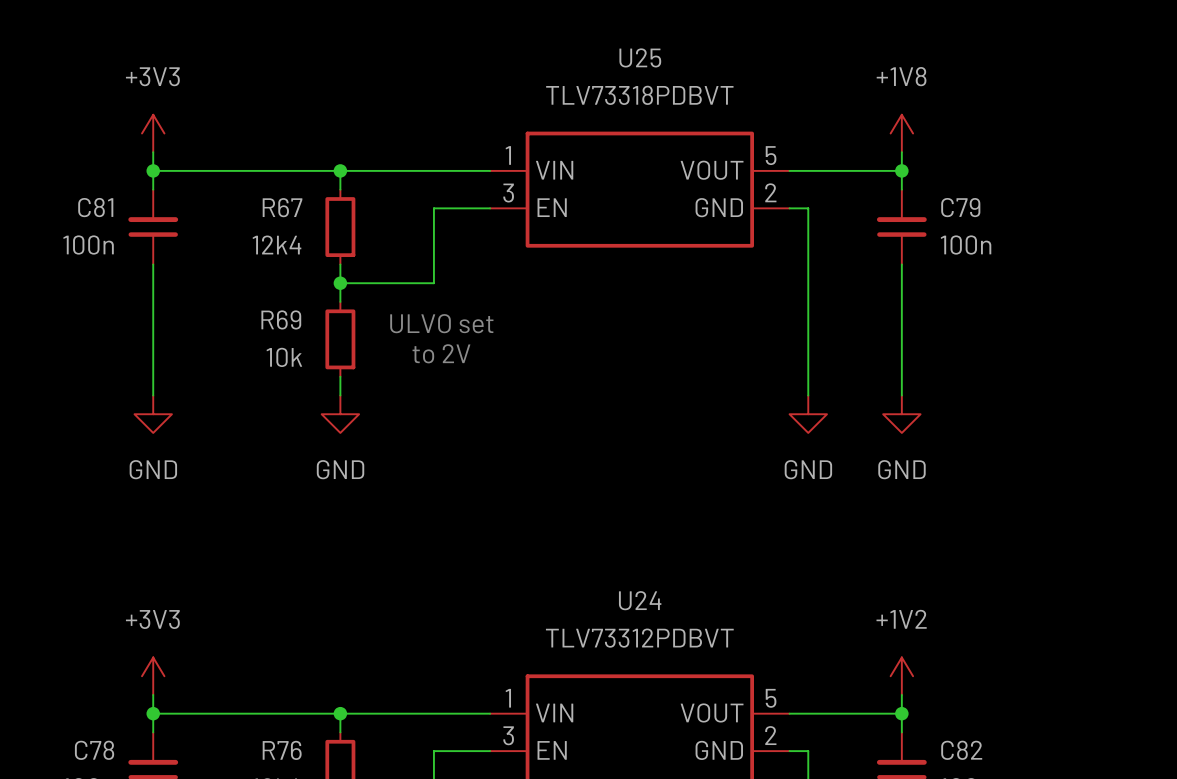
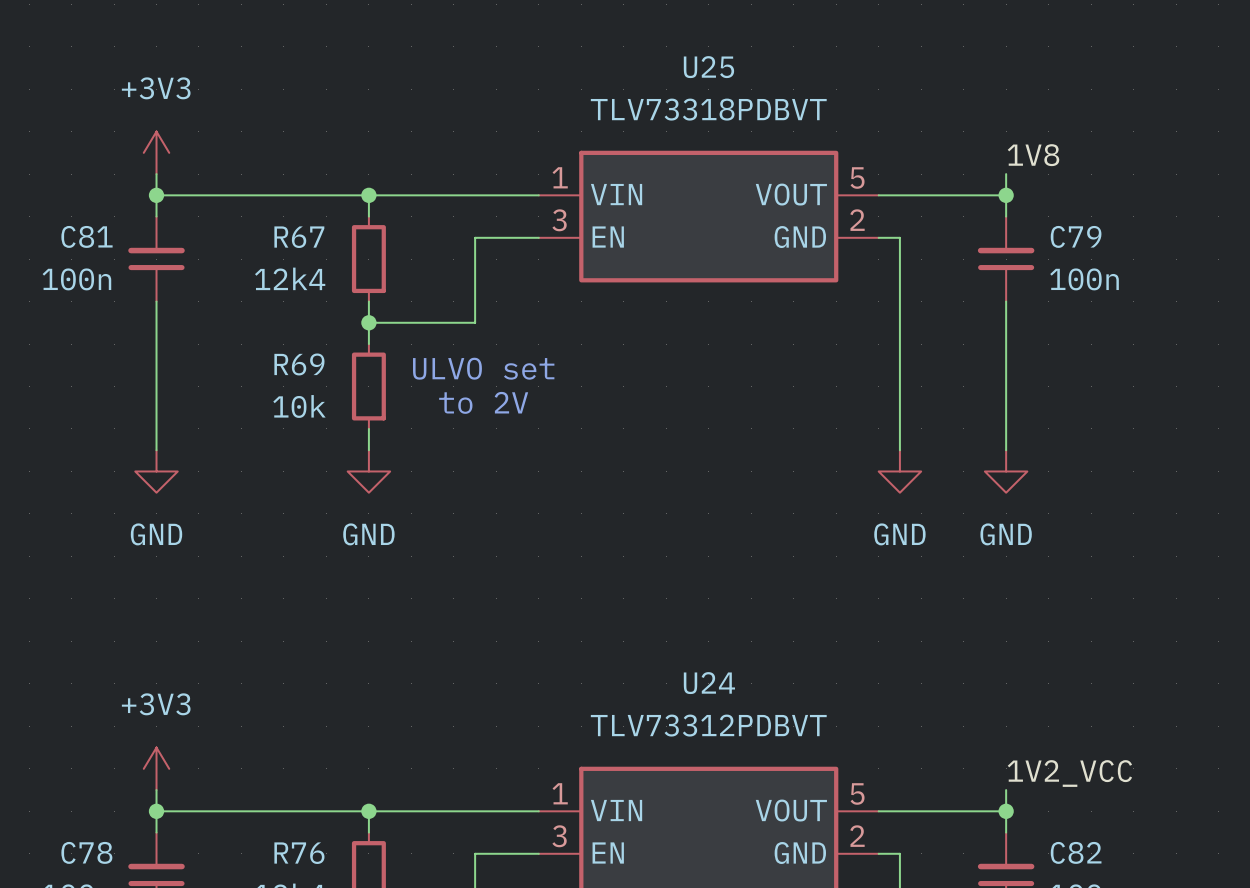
power symbol: +1V8 (901, 133) -> none
label: none -> 1V8 (1033, 155)
power symbol: +1V2 (901, 676) -> none
label: none -> 1V2_VCC (1069, 773)

